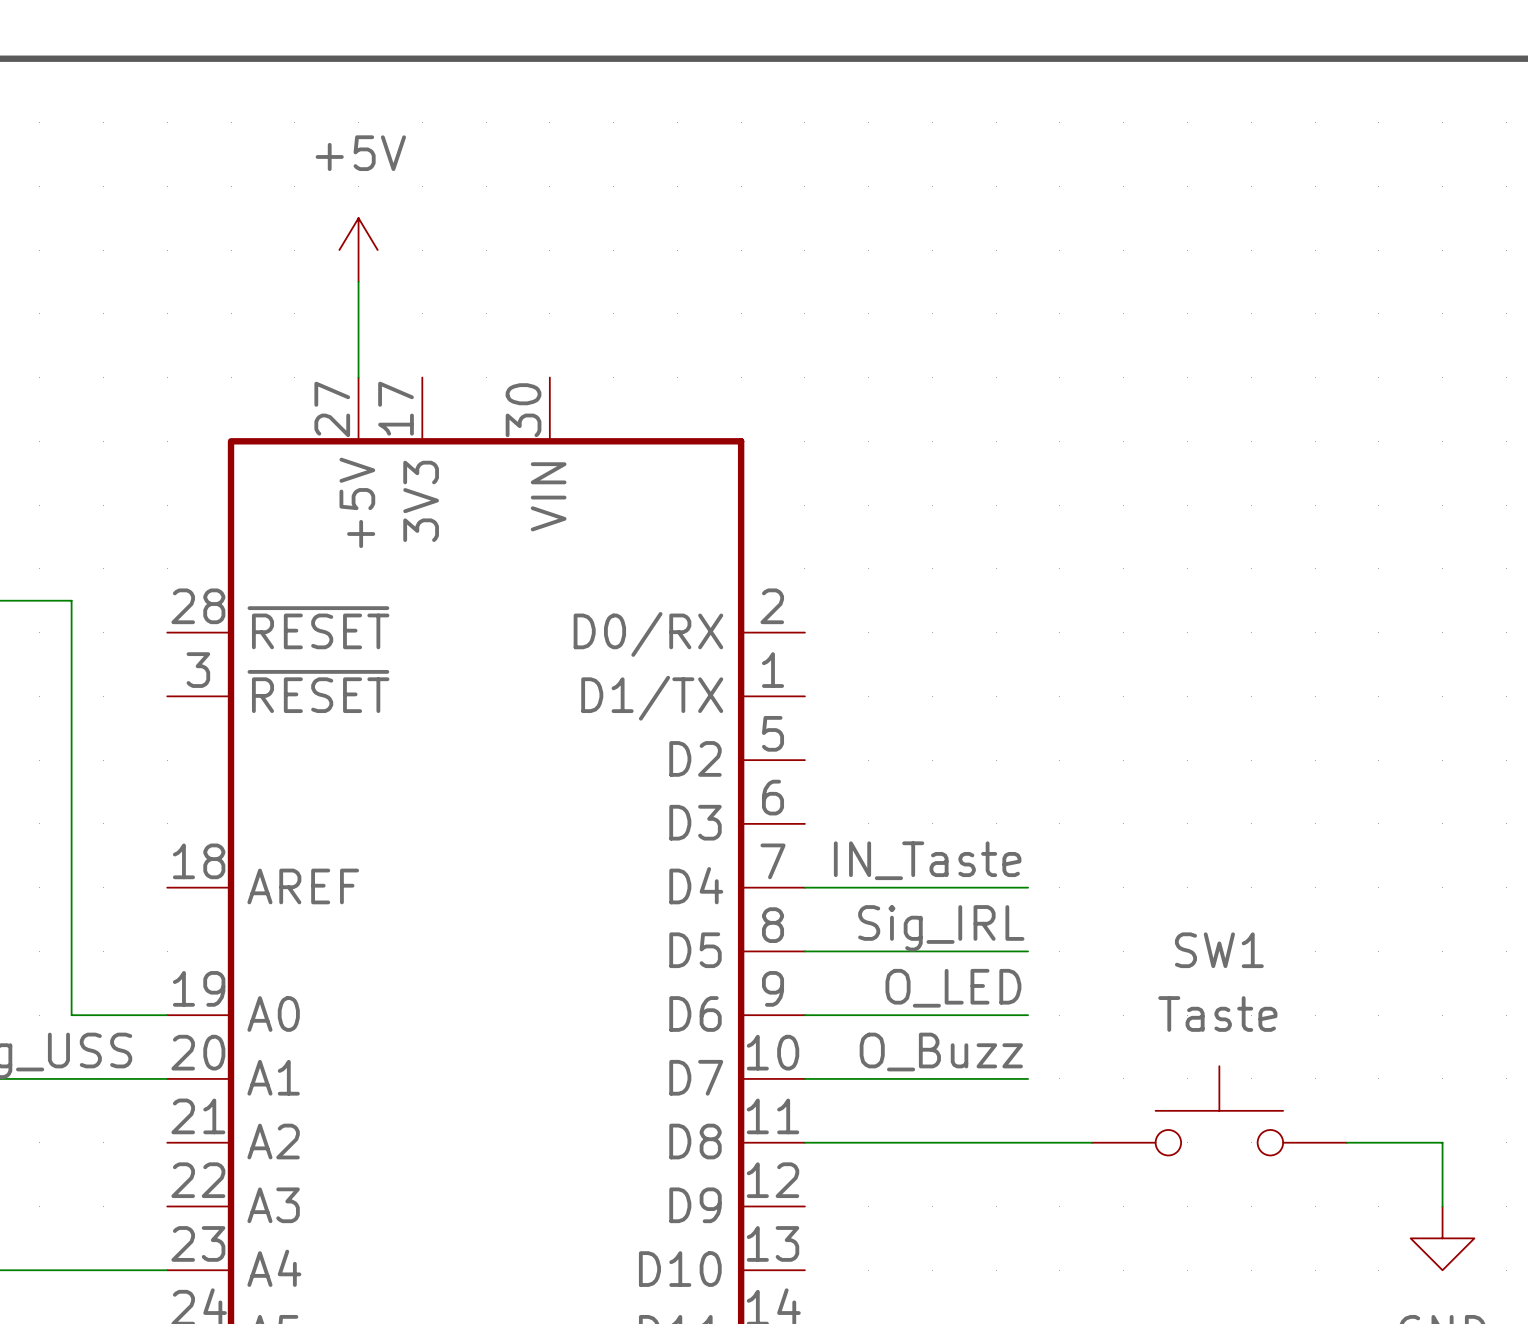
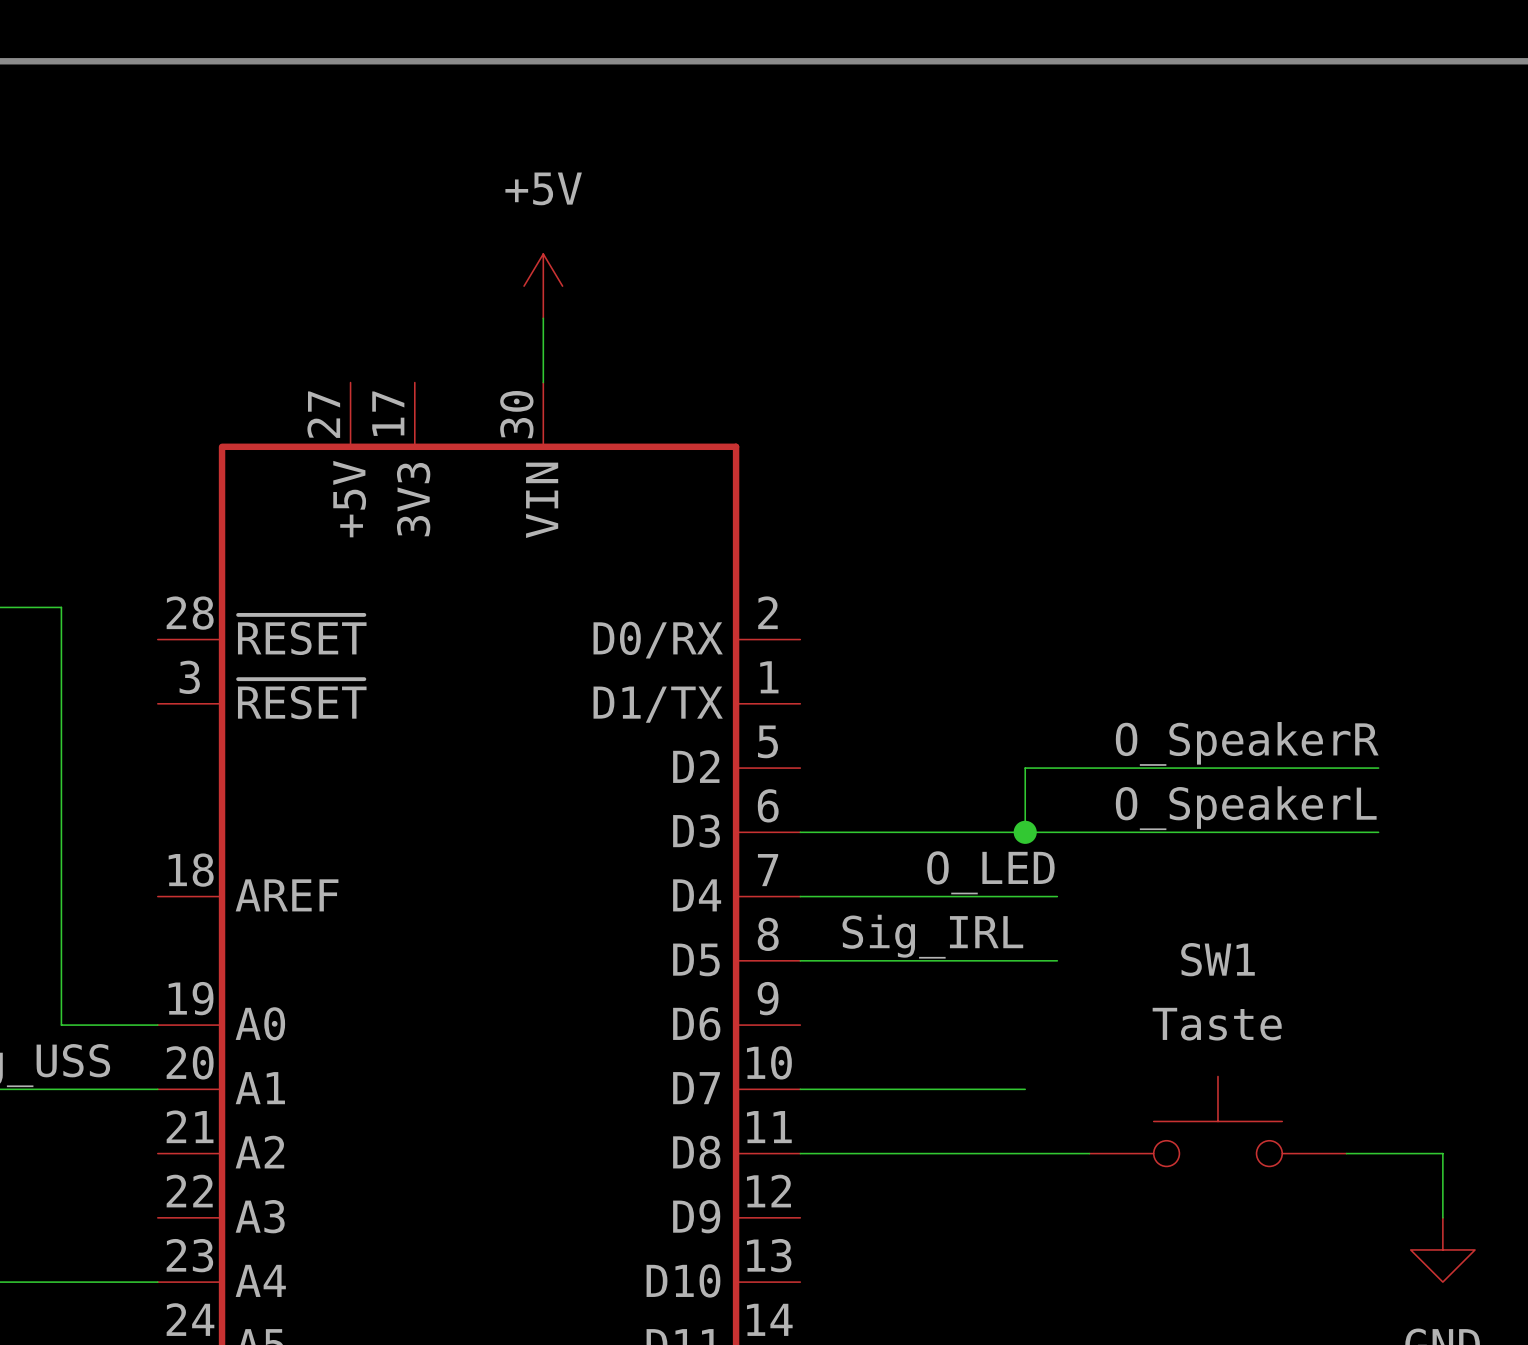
power symbol position: +5V (358, 250) -> +5V (543, 286)
wire: (358, 281) (358, 377) -> none
wire: none -> (543, 318) (543, 382)
label: none -> O_SpeakerR (1247, 743)
wire: none -> (1378, 768) (1025, 768) (1025, 832)
label: none -> O_SpeakerL (1246, 808)
wire: none -> (800, 832) (1378, 832)
junction: none -> (1025, 832)
label: IN_Taste (927, 860) -> none
wire: none -> (1025, 896) (1057, 896)
wire: none -> (1025, 960) (1057, 960)
label position: O_LED (953, 988) -> O_LED (990, 872)
wire: (804, 1015) (1028, 1015) -> none
label: O_Buzz (941, 1052) -> none

